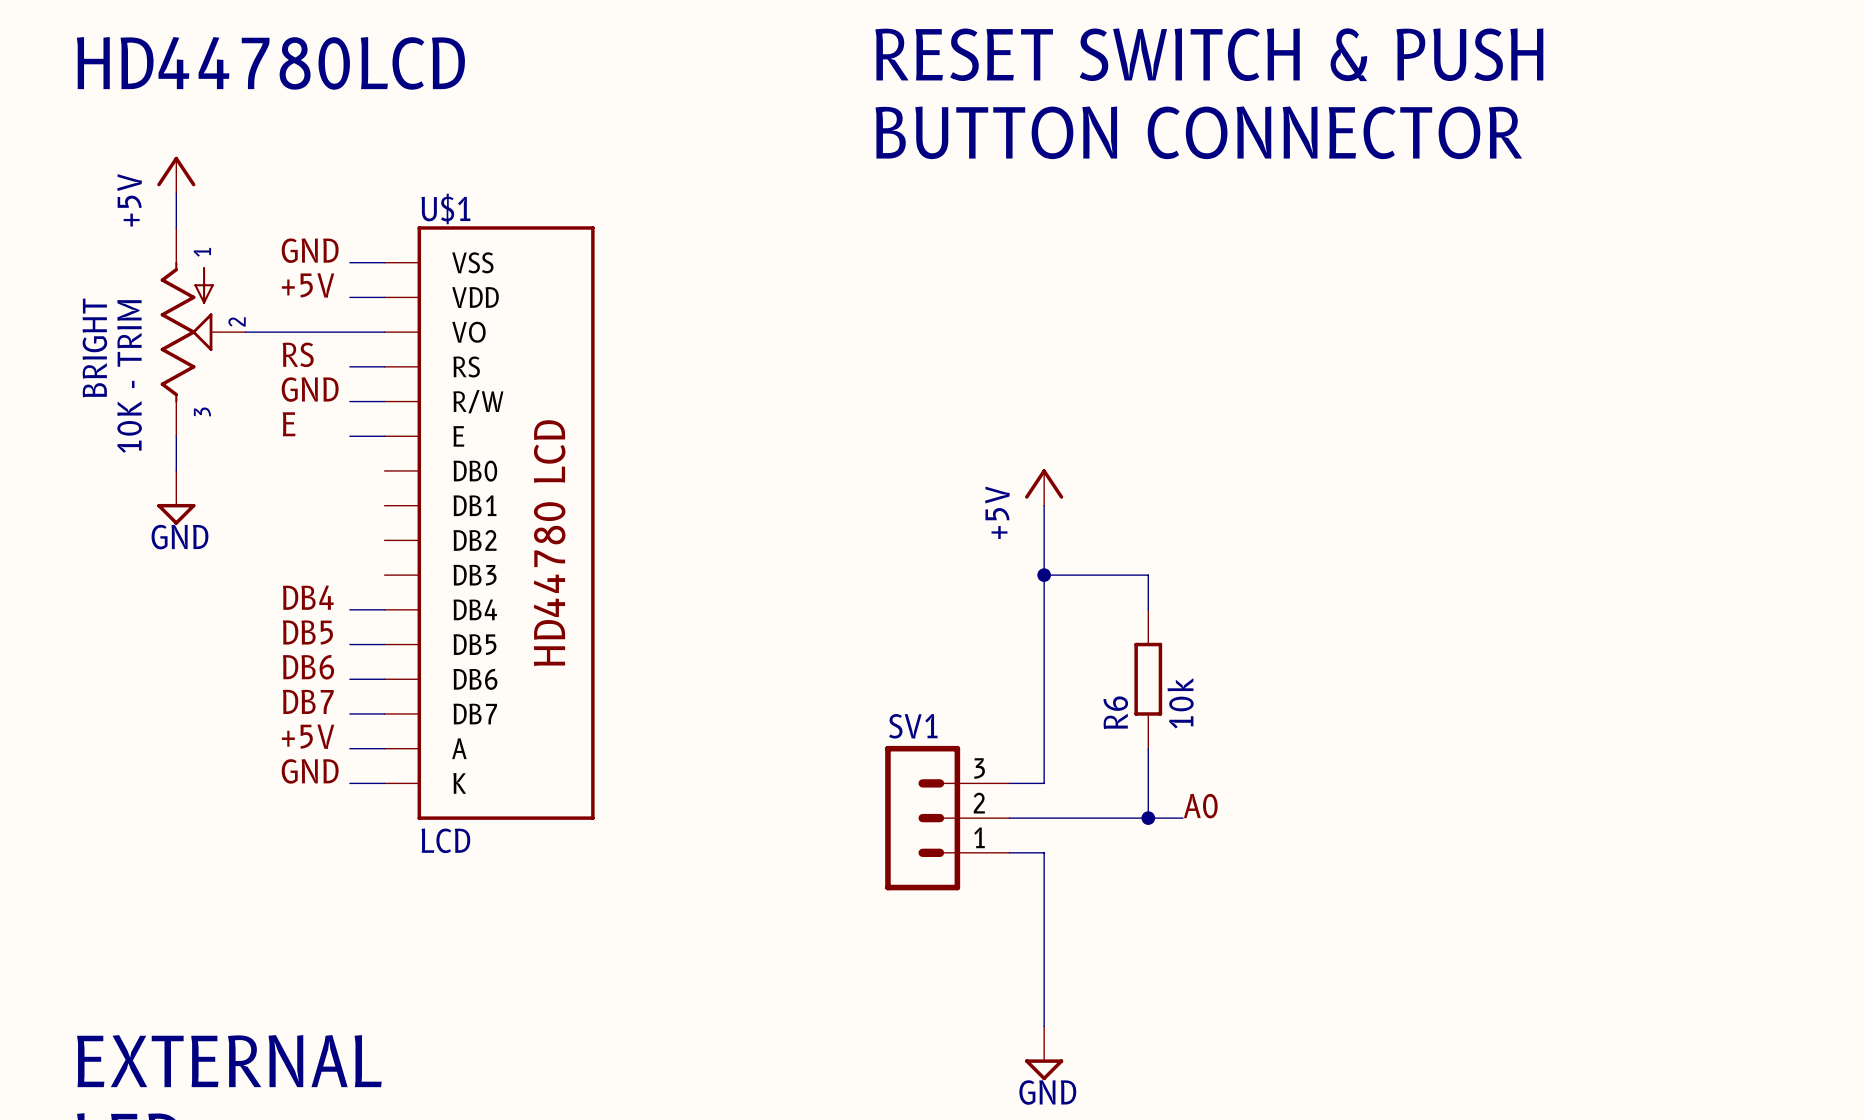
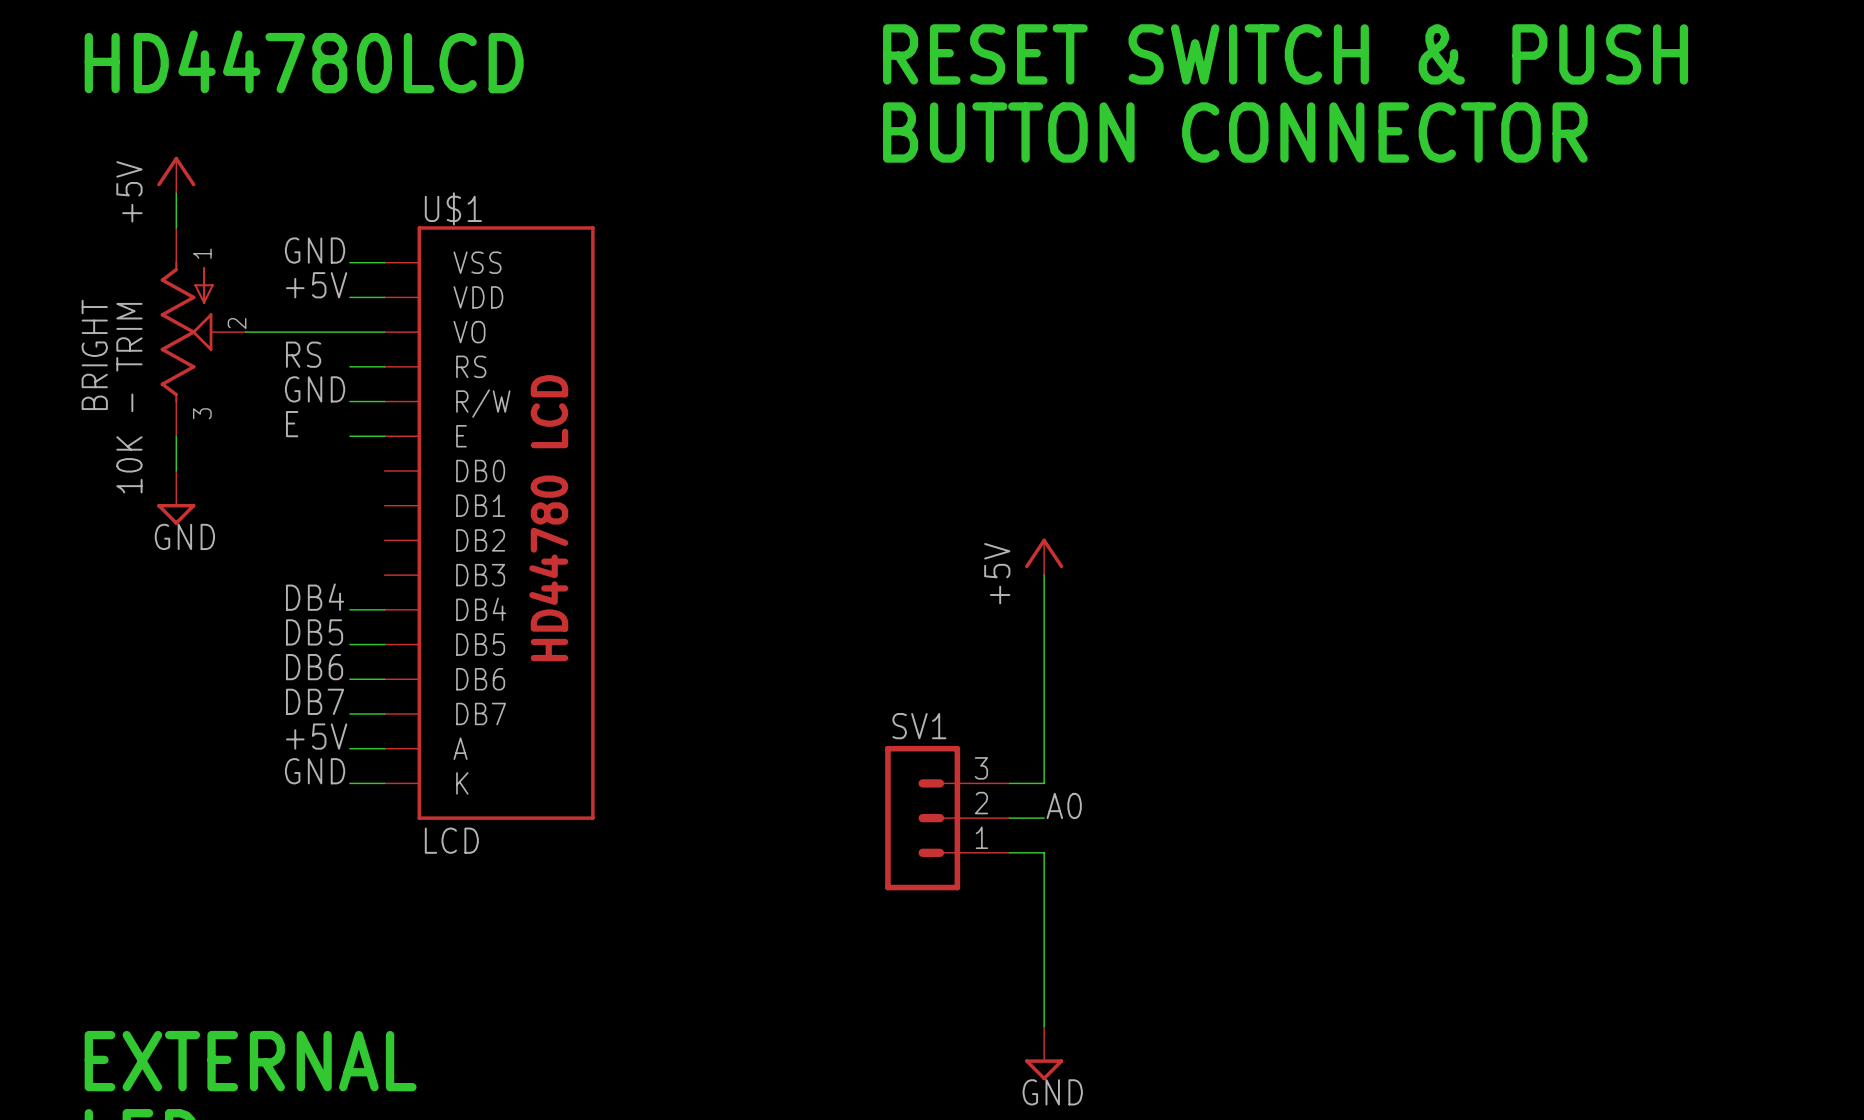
power symbol position: +5V (1044, 487) -> +5V (1044, 556)
wire: (1044, 505) (1044, 575) (1148, 575) (1148, 609) -> none
junction: (1044, 575) -> none
R6: 10k (1148, 679) -> none
wire: (1148, 748) (1148, 818) -> none
label position: A0 (1200, 806) -> A0 (1064, 805)
wire: (1044, 818) (1183, 818) -> none
junction: (1148, 818) -> none

